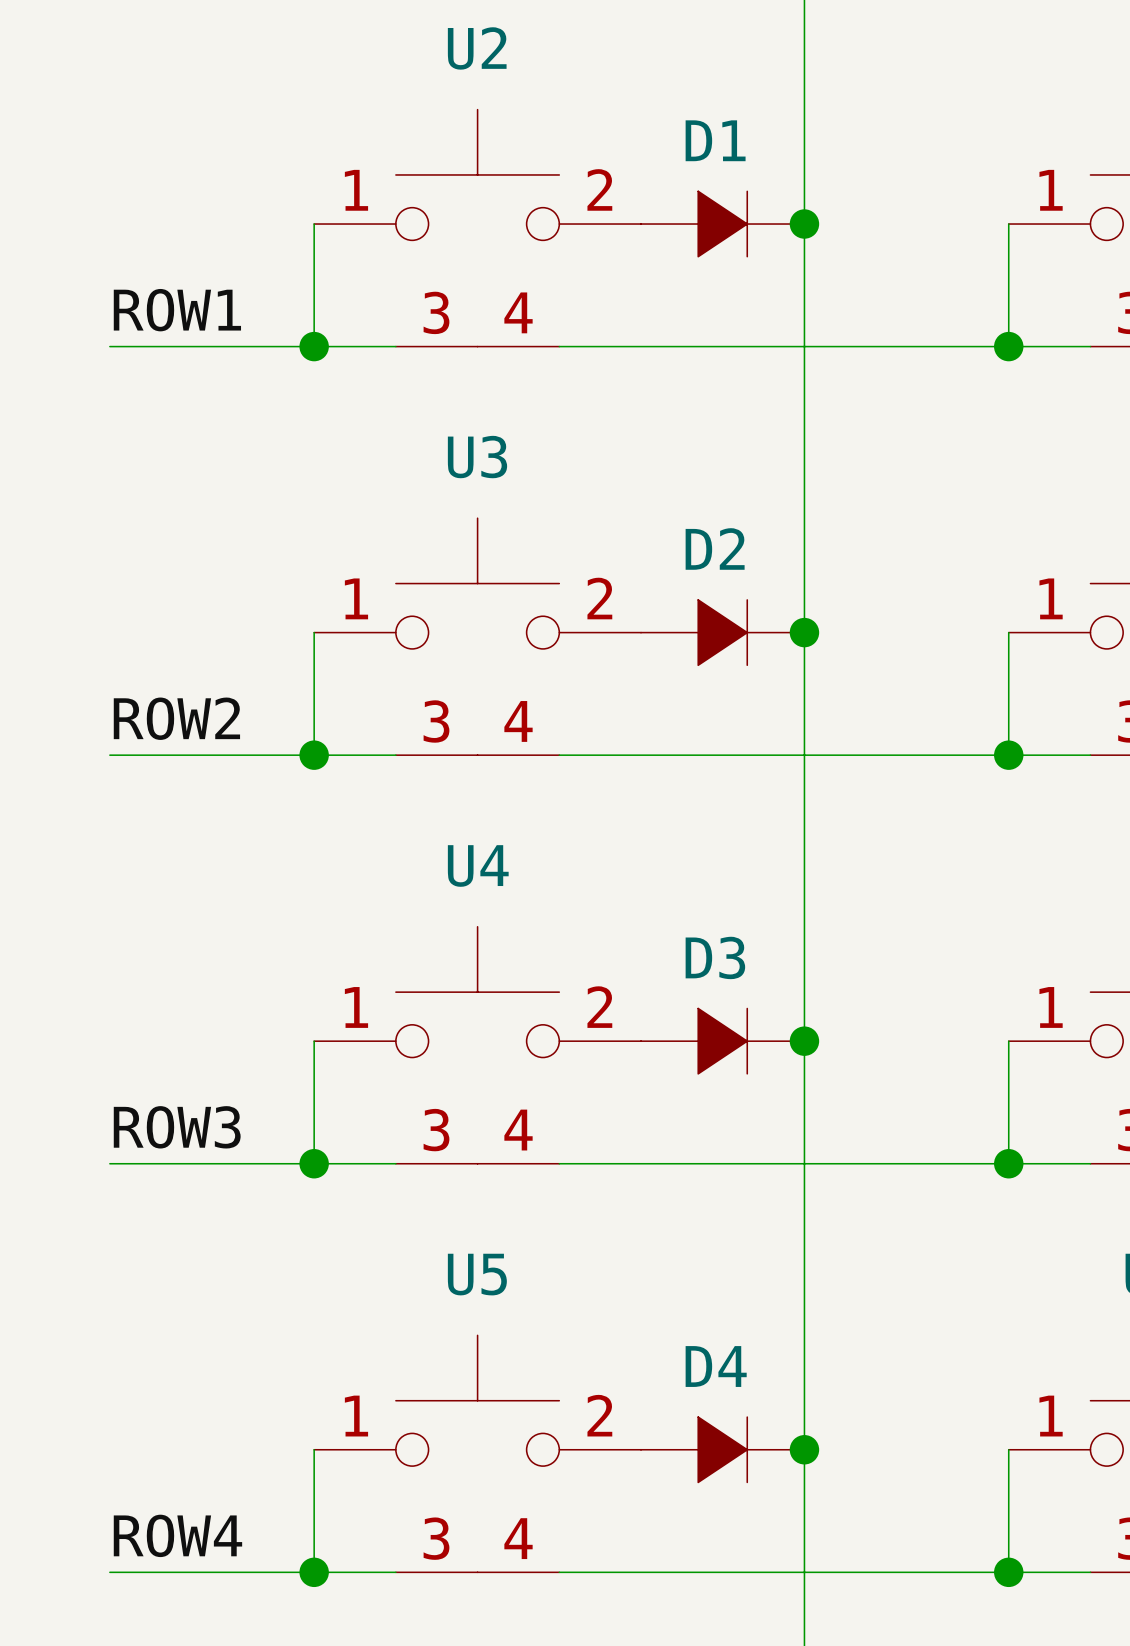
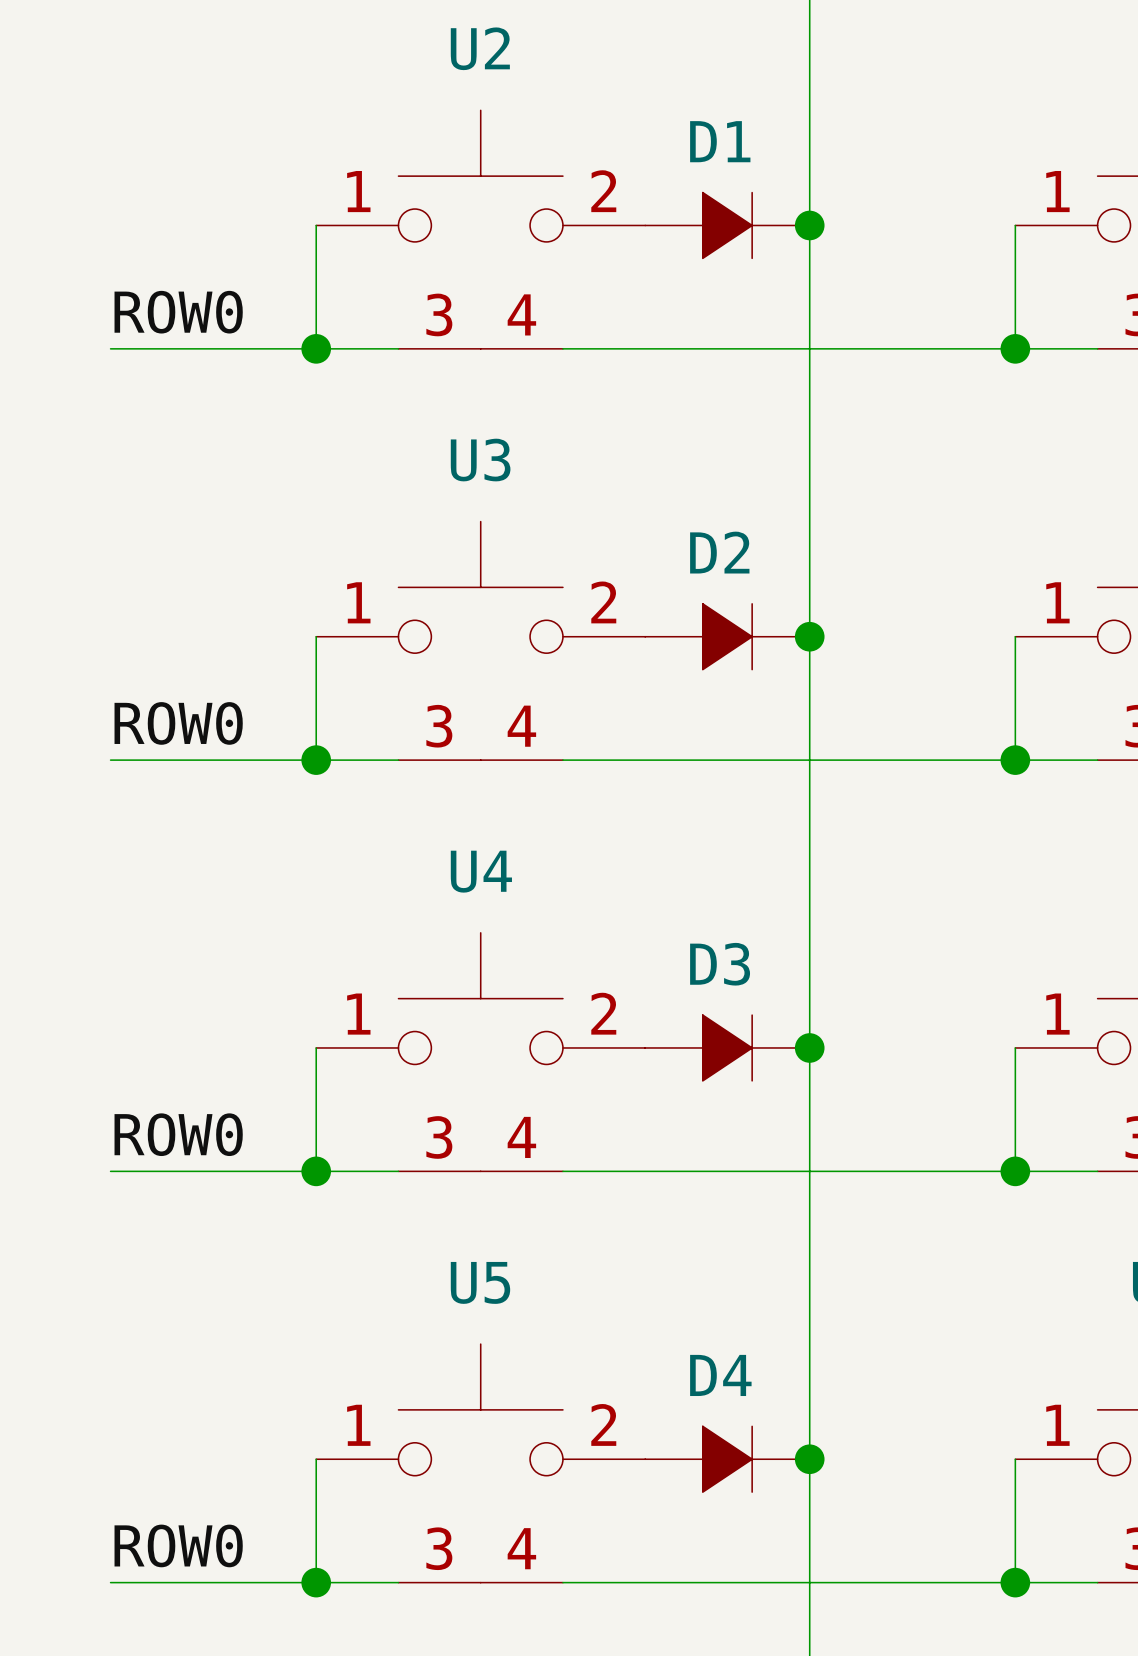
label: ROW1 (177, 310) -> ROW0 (178, 312)
label: ROW2 (176, 718) -> ROW0 (178, 723)
label: ROW3 (177, 1127) -> ROW0 (178, 1134)
label: ROW4 (177, 1535) -> ROW0 (178, 1545)

